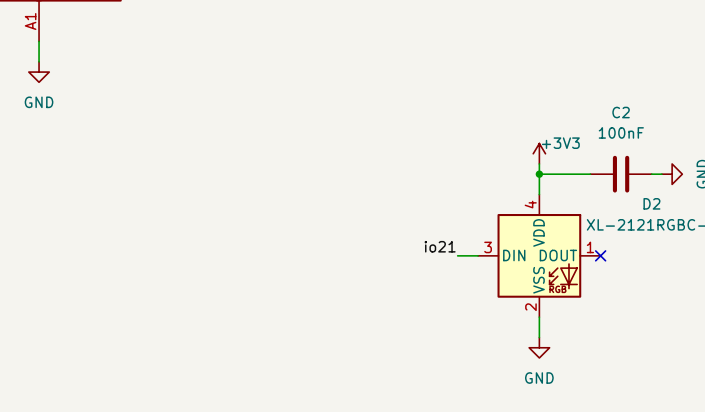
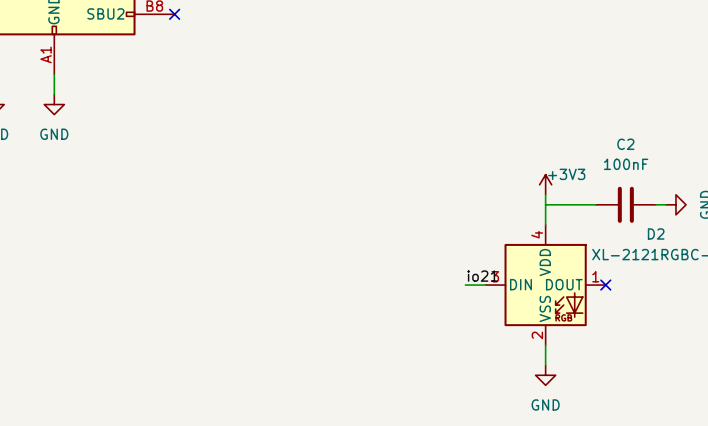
junction: (539, 174) -> none
label position: io21 (440, 246) -> io21 (482, 276)

